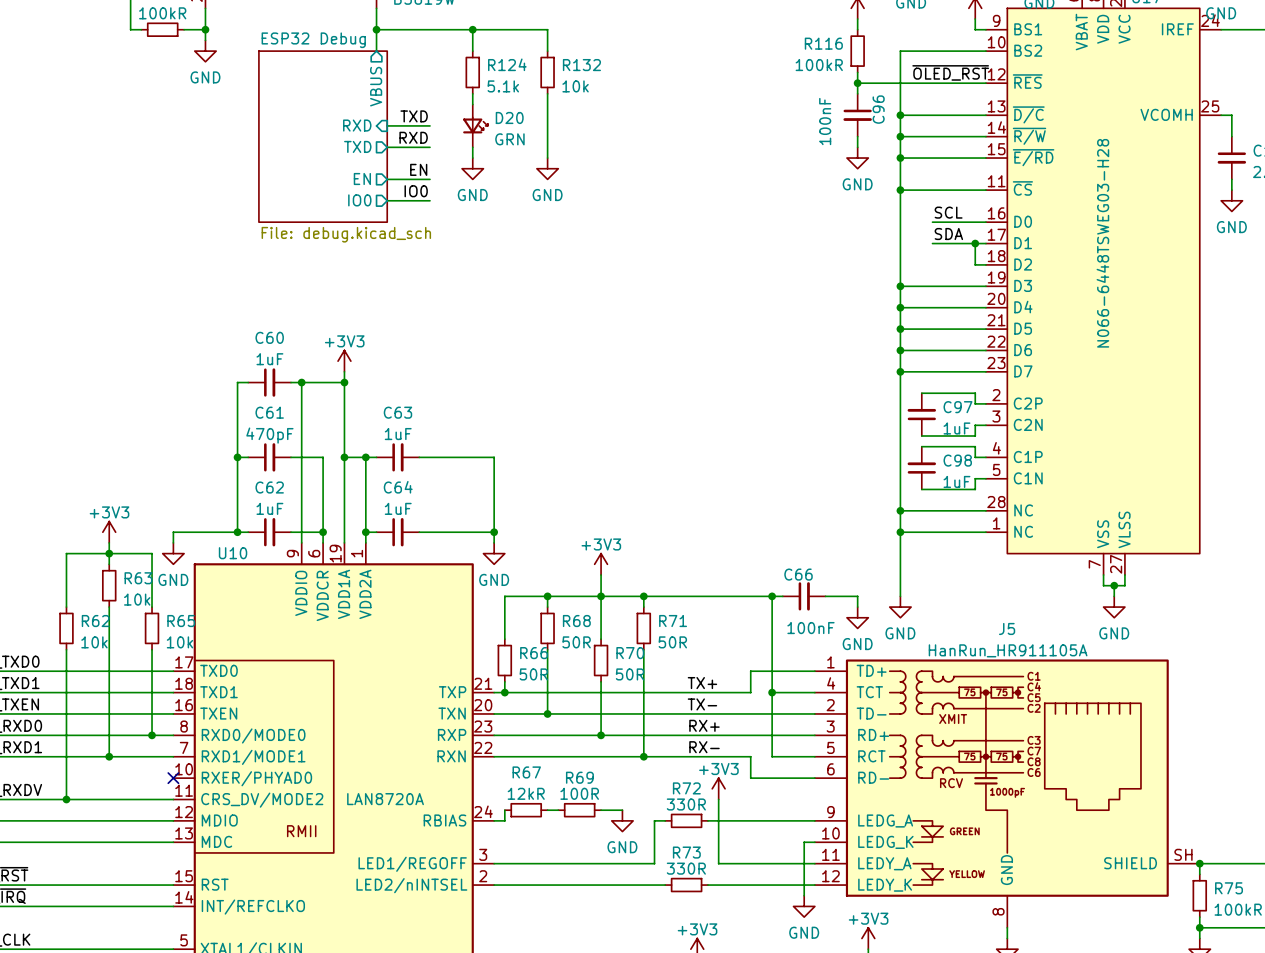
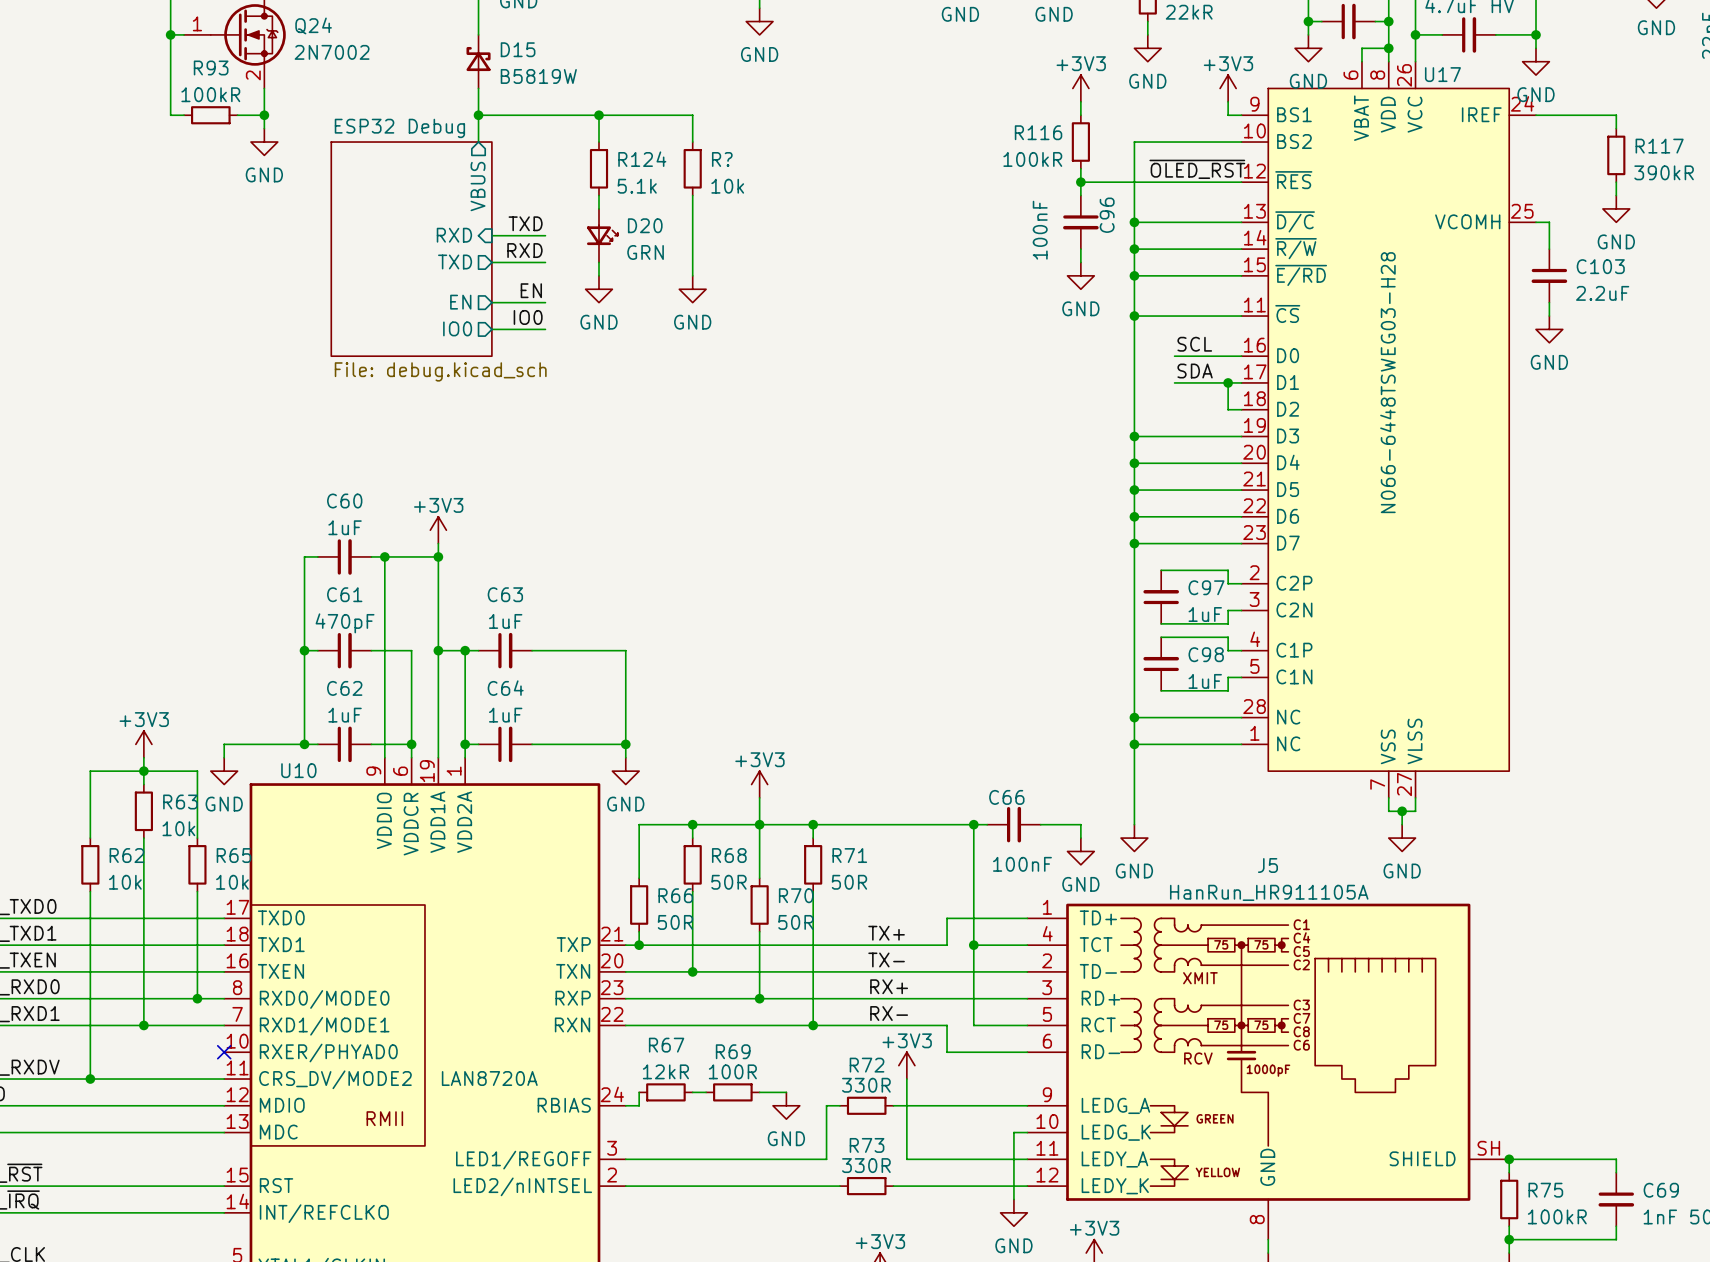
R132 name: R132 (581, 65) -> R? (722, 159)

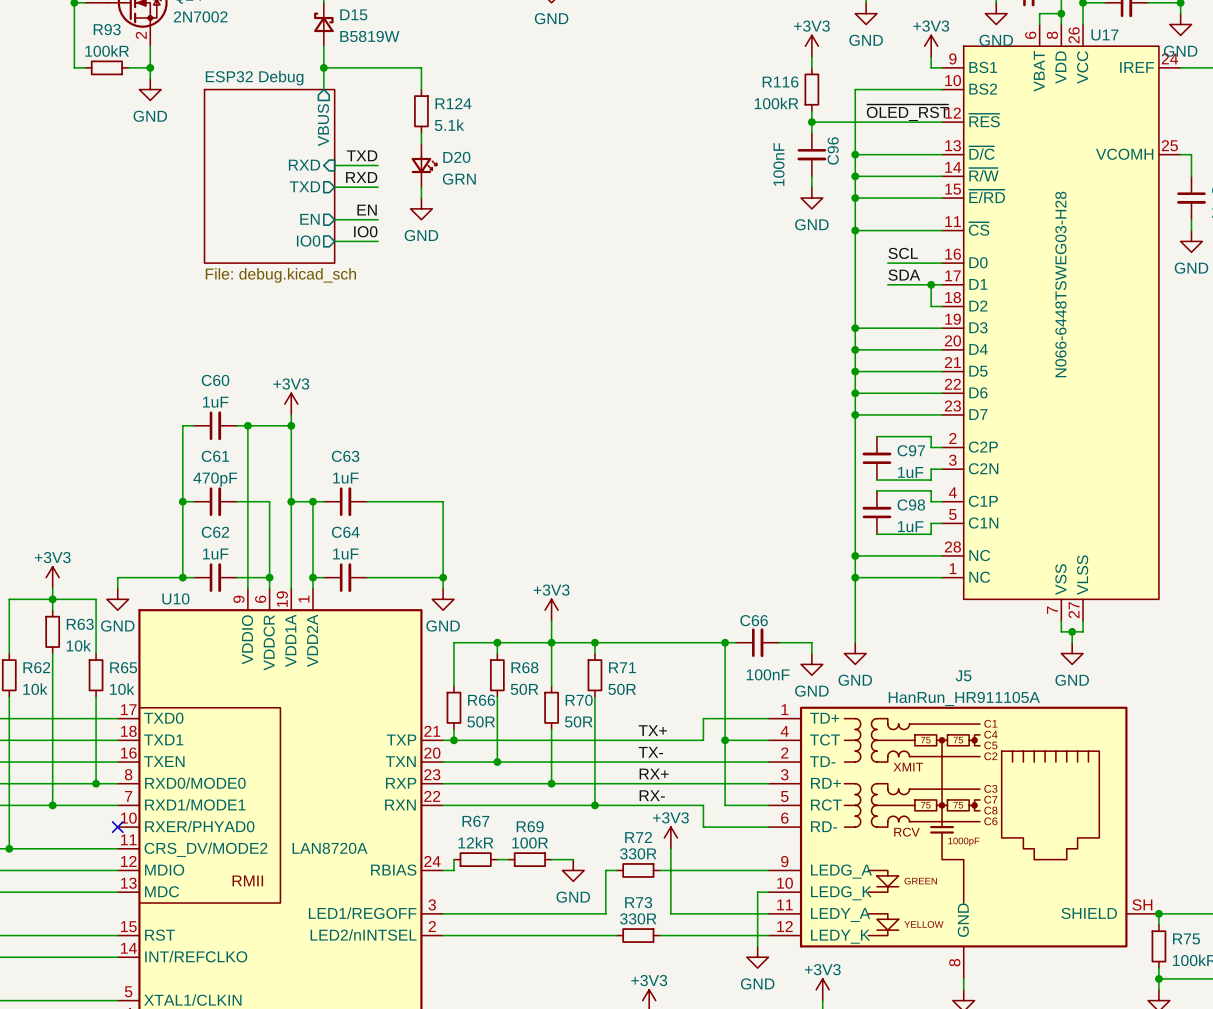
wire: (599, 115) (692, 115) (692, 142) -> none
junction: (599, 115) -> none
R?: 10k (692, 168) -> none
wire: (692, 195) (692, 275) -> none
power symbol: GND (692, 289) -> none

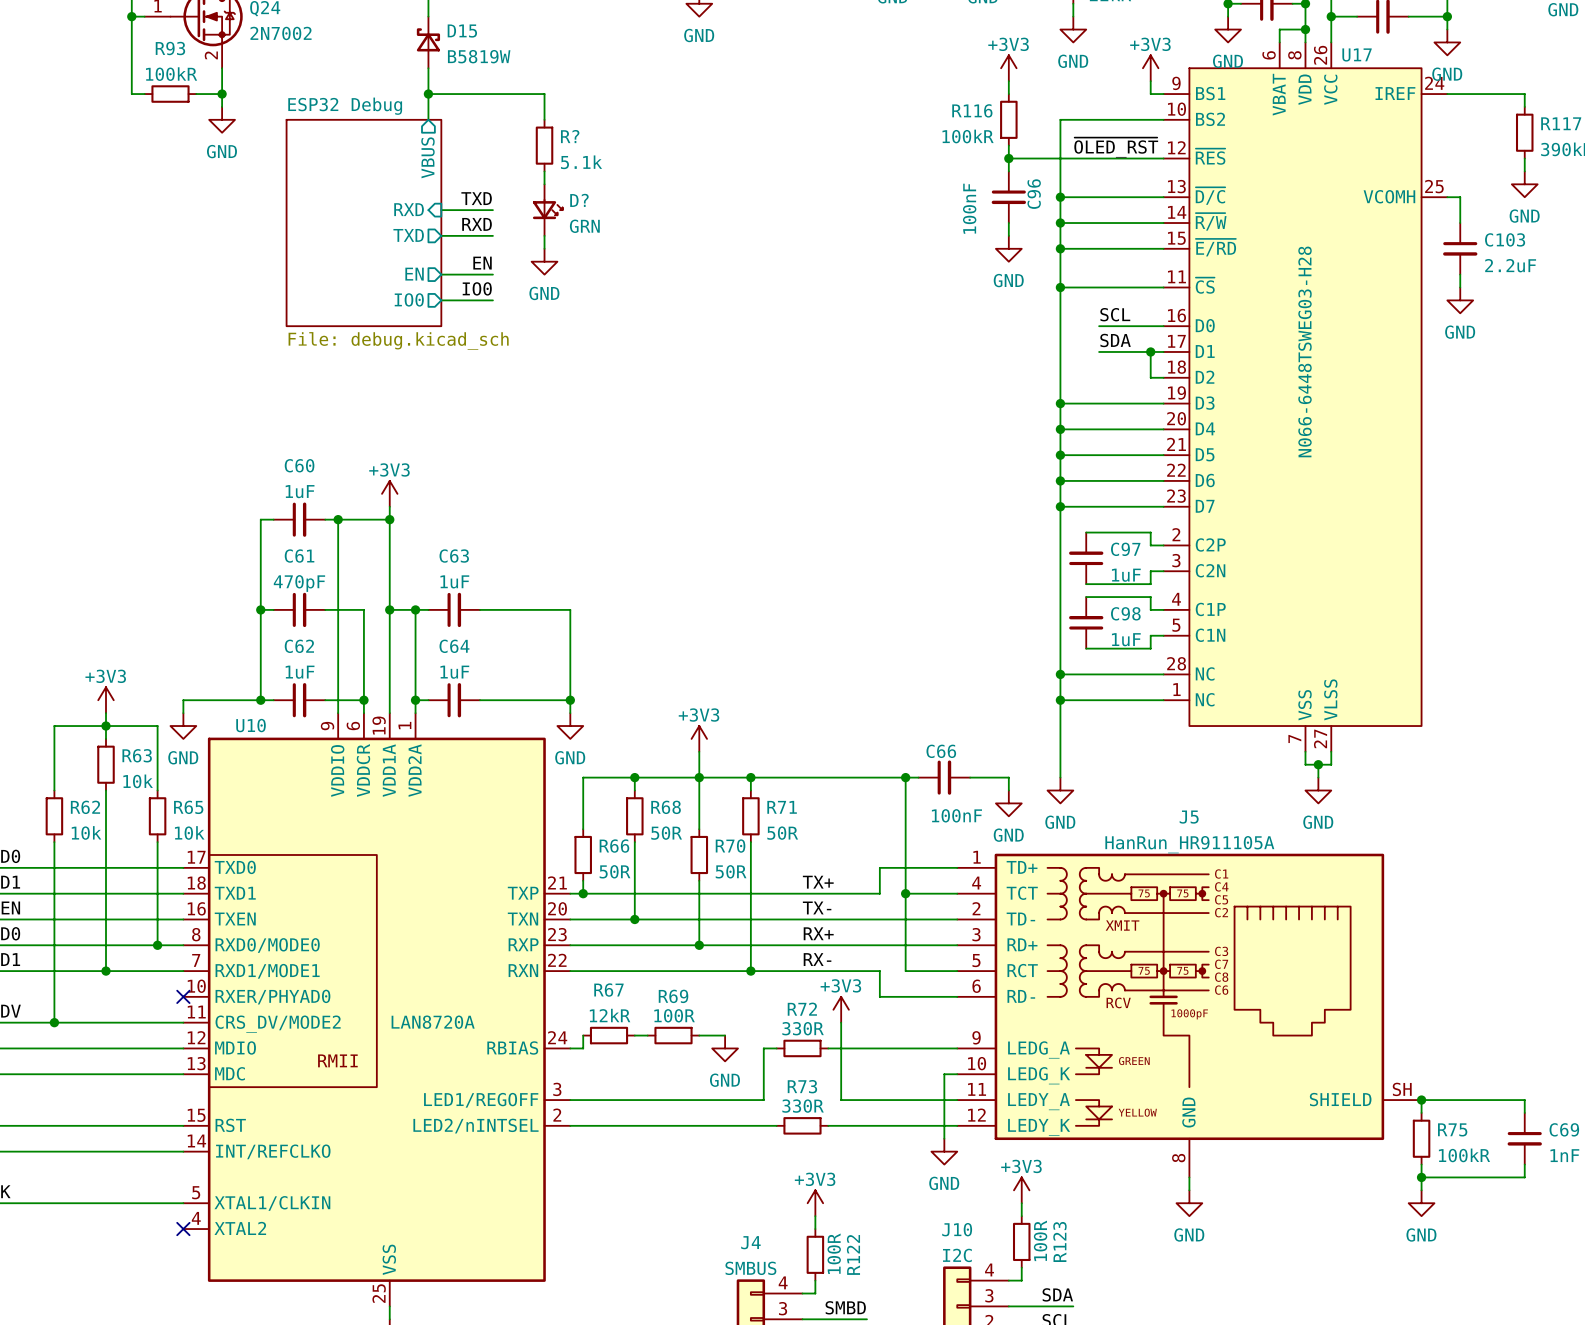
R124 name: R124 (453, 103) -> R? (570, 136)
D20 name: D20 (456, 157) -> D? (579, 200)

